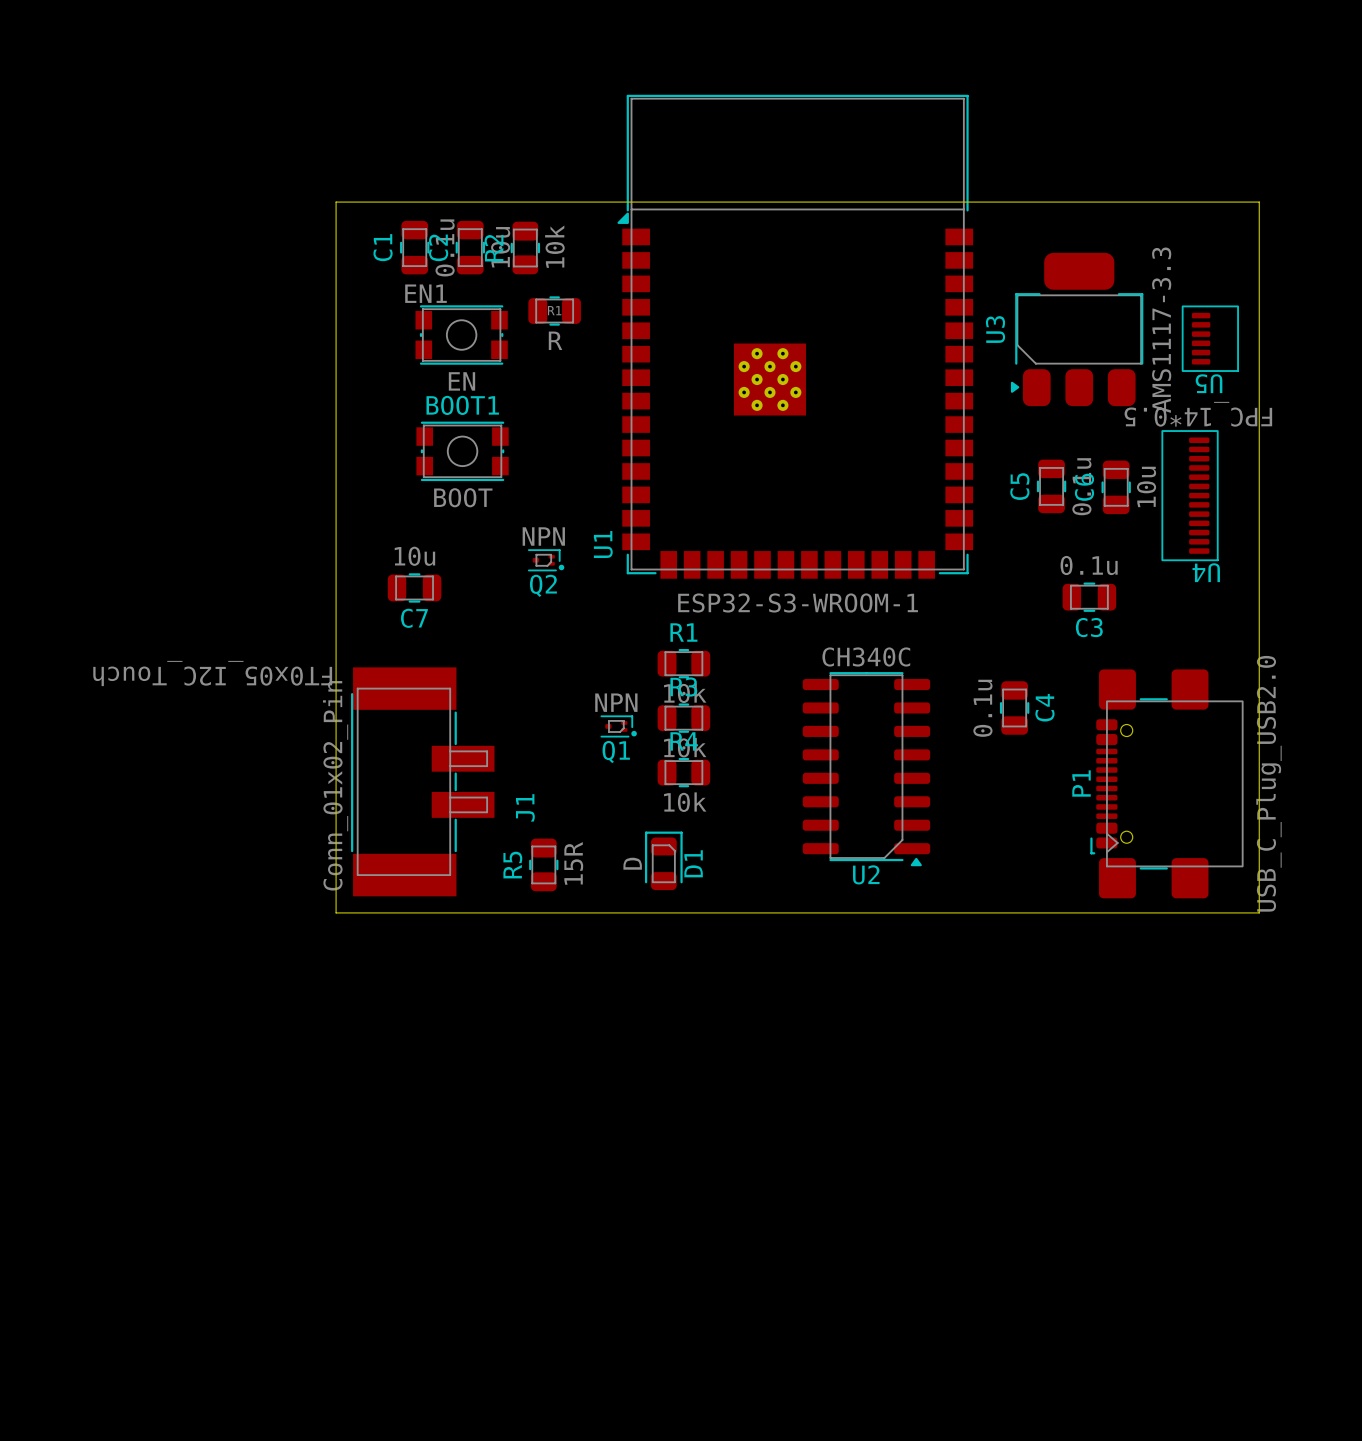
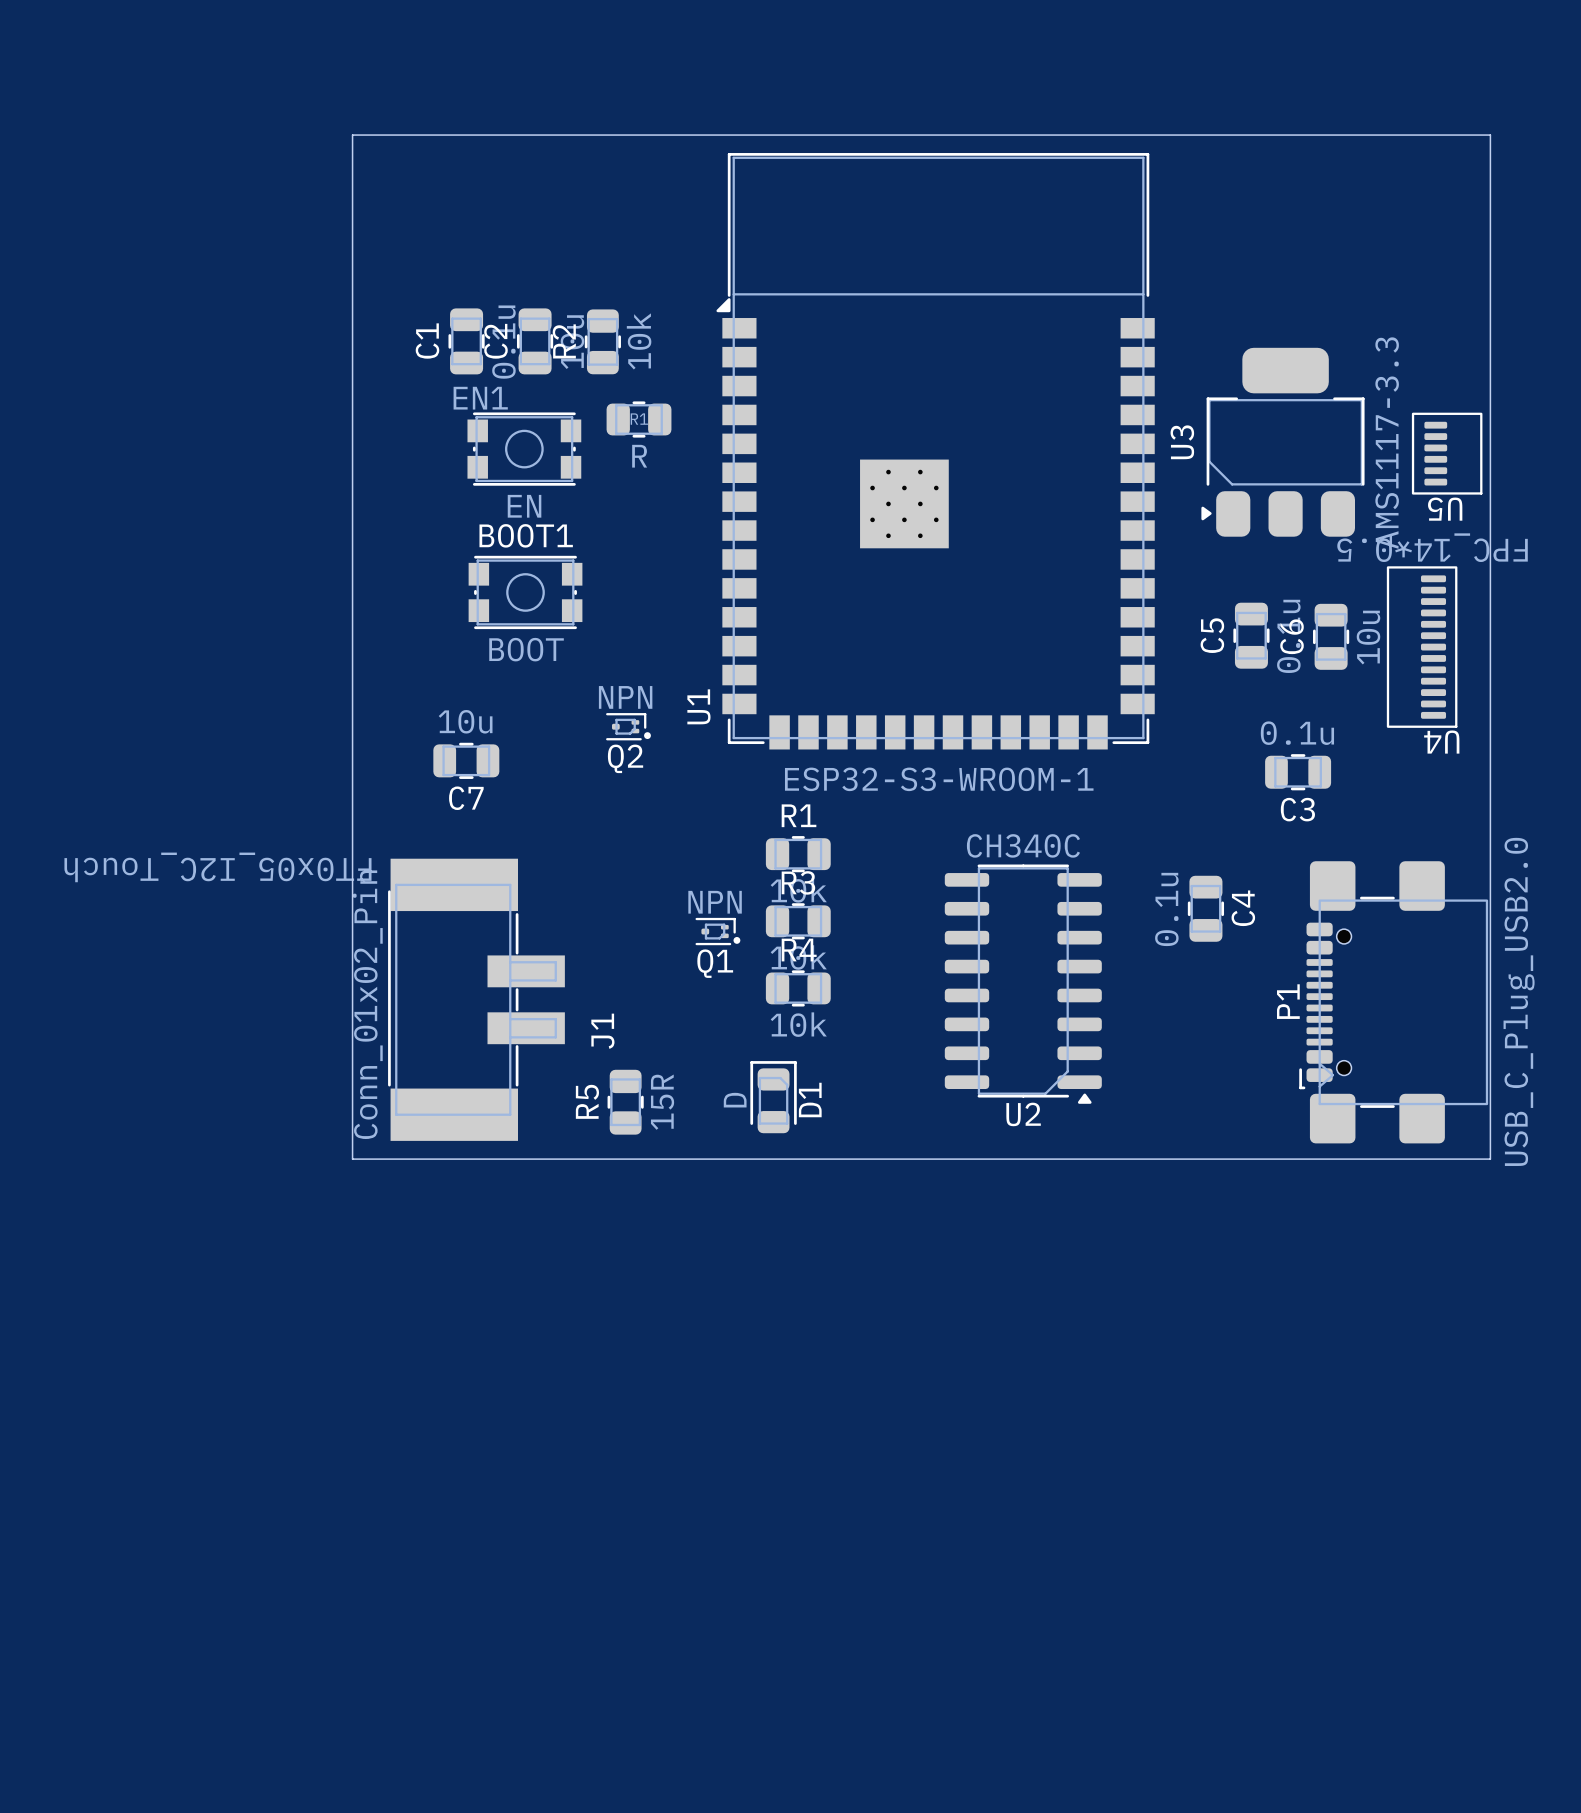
board edge: (336, 202) (1259, 202) (1259, 912) (336, 912) (336, 202) -> (352, 135) (352, 1159) (1490, 1159) (1490, 135) (352, 135)

